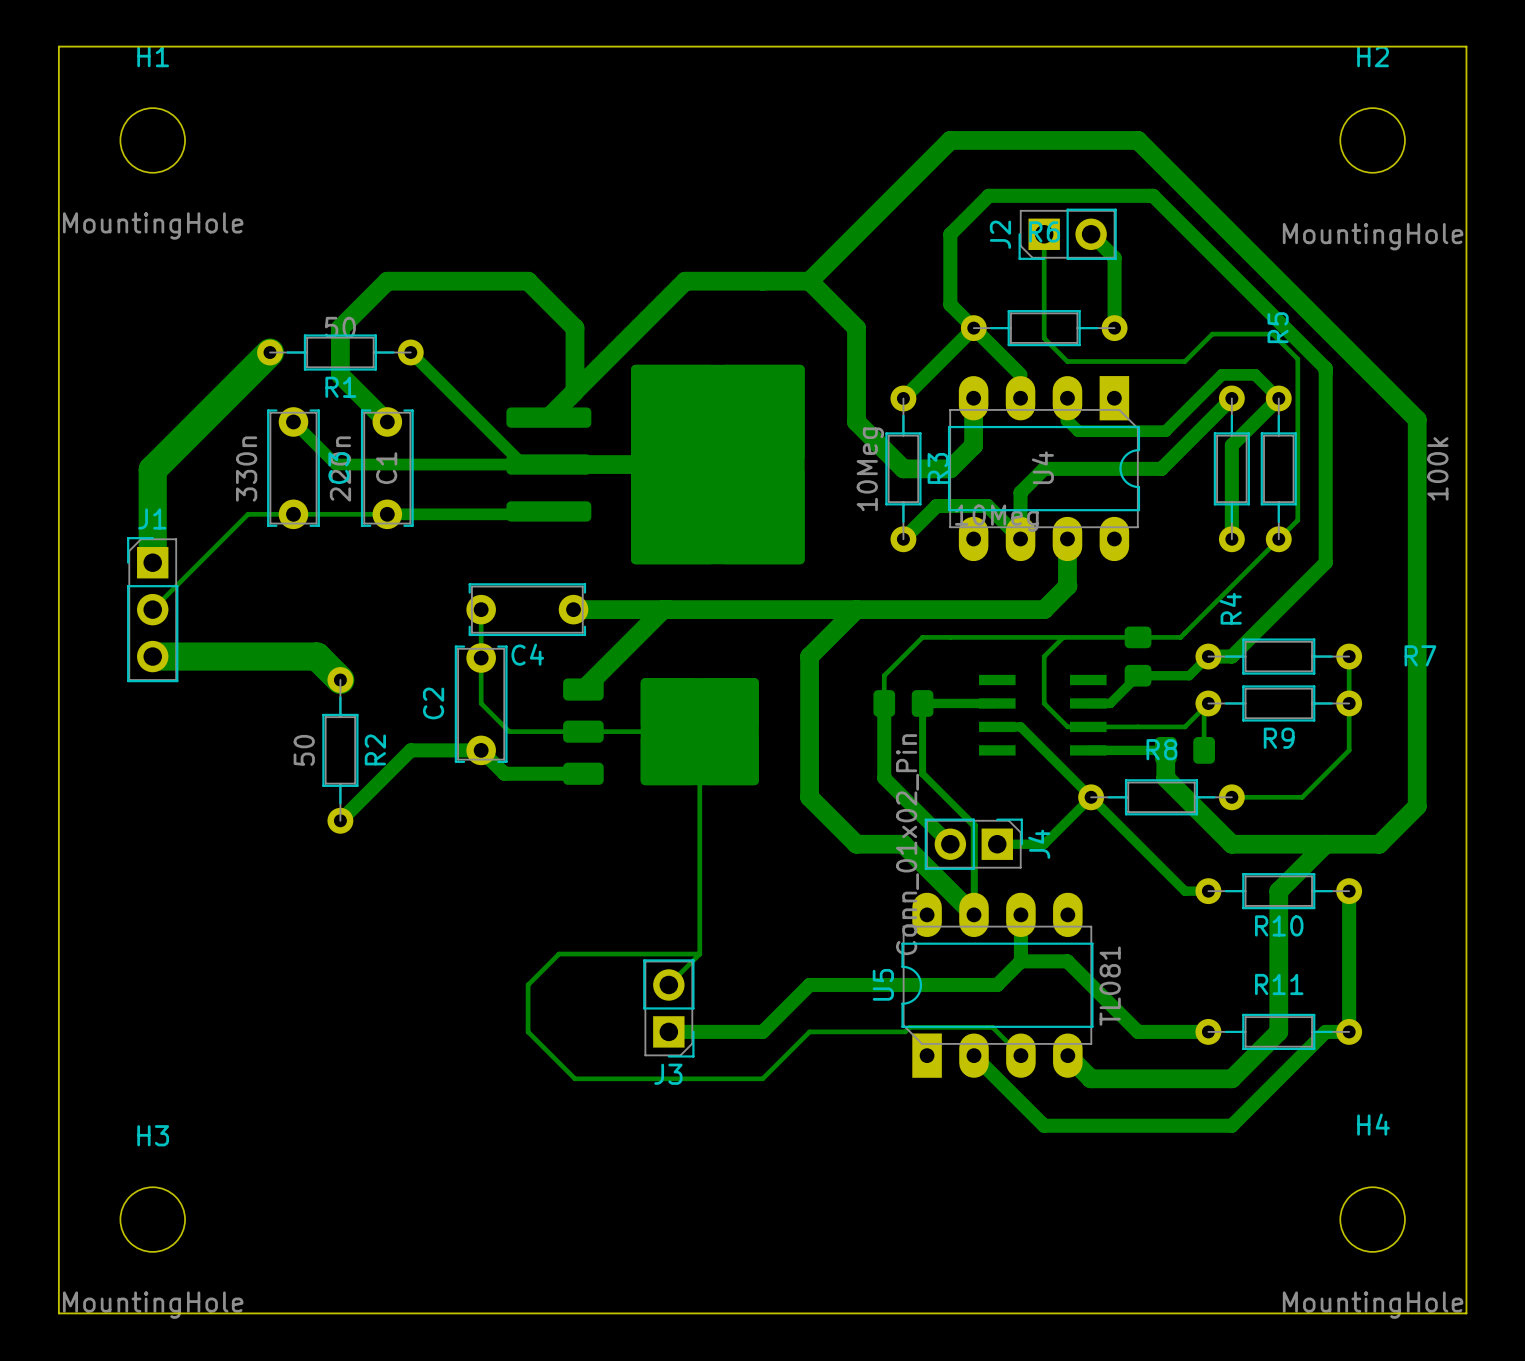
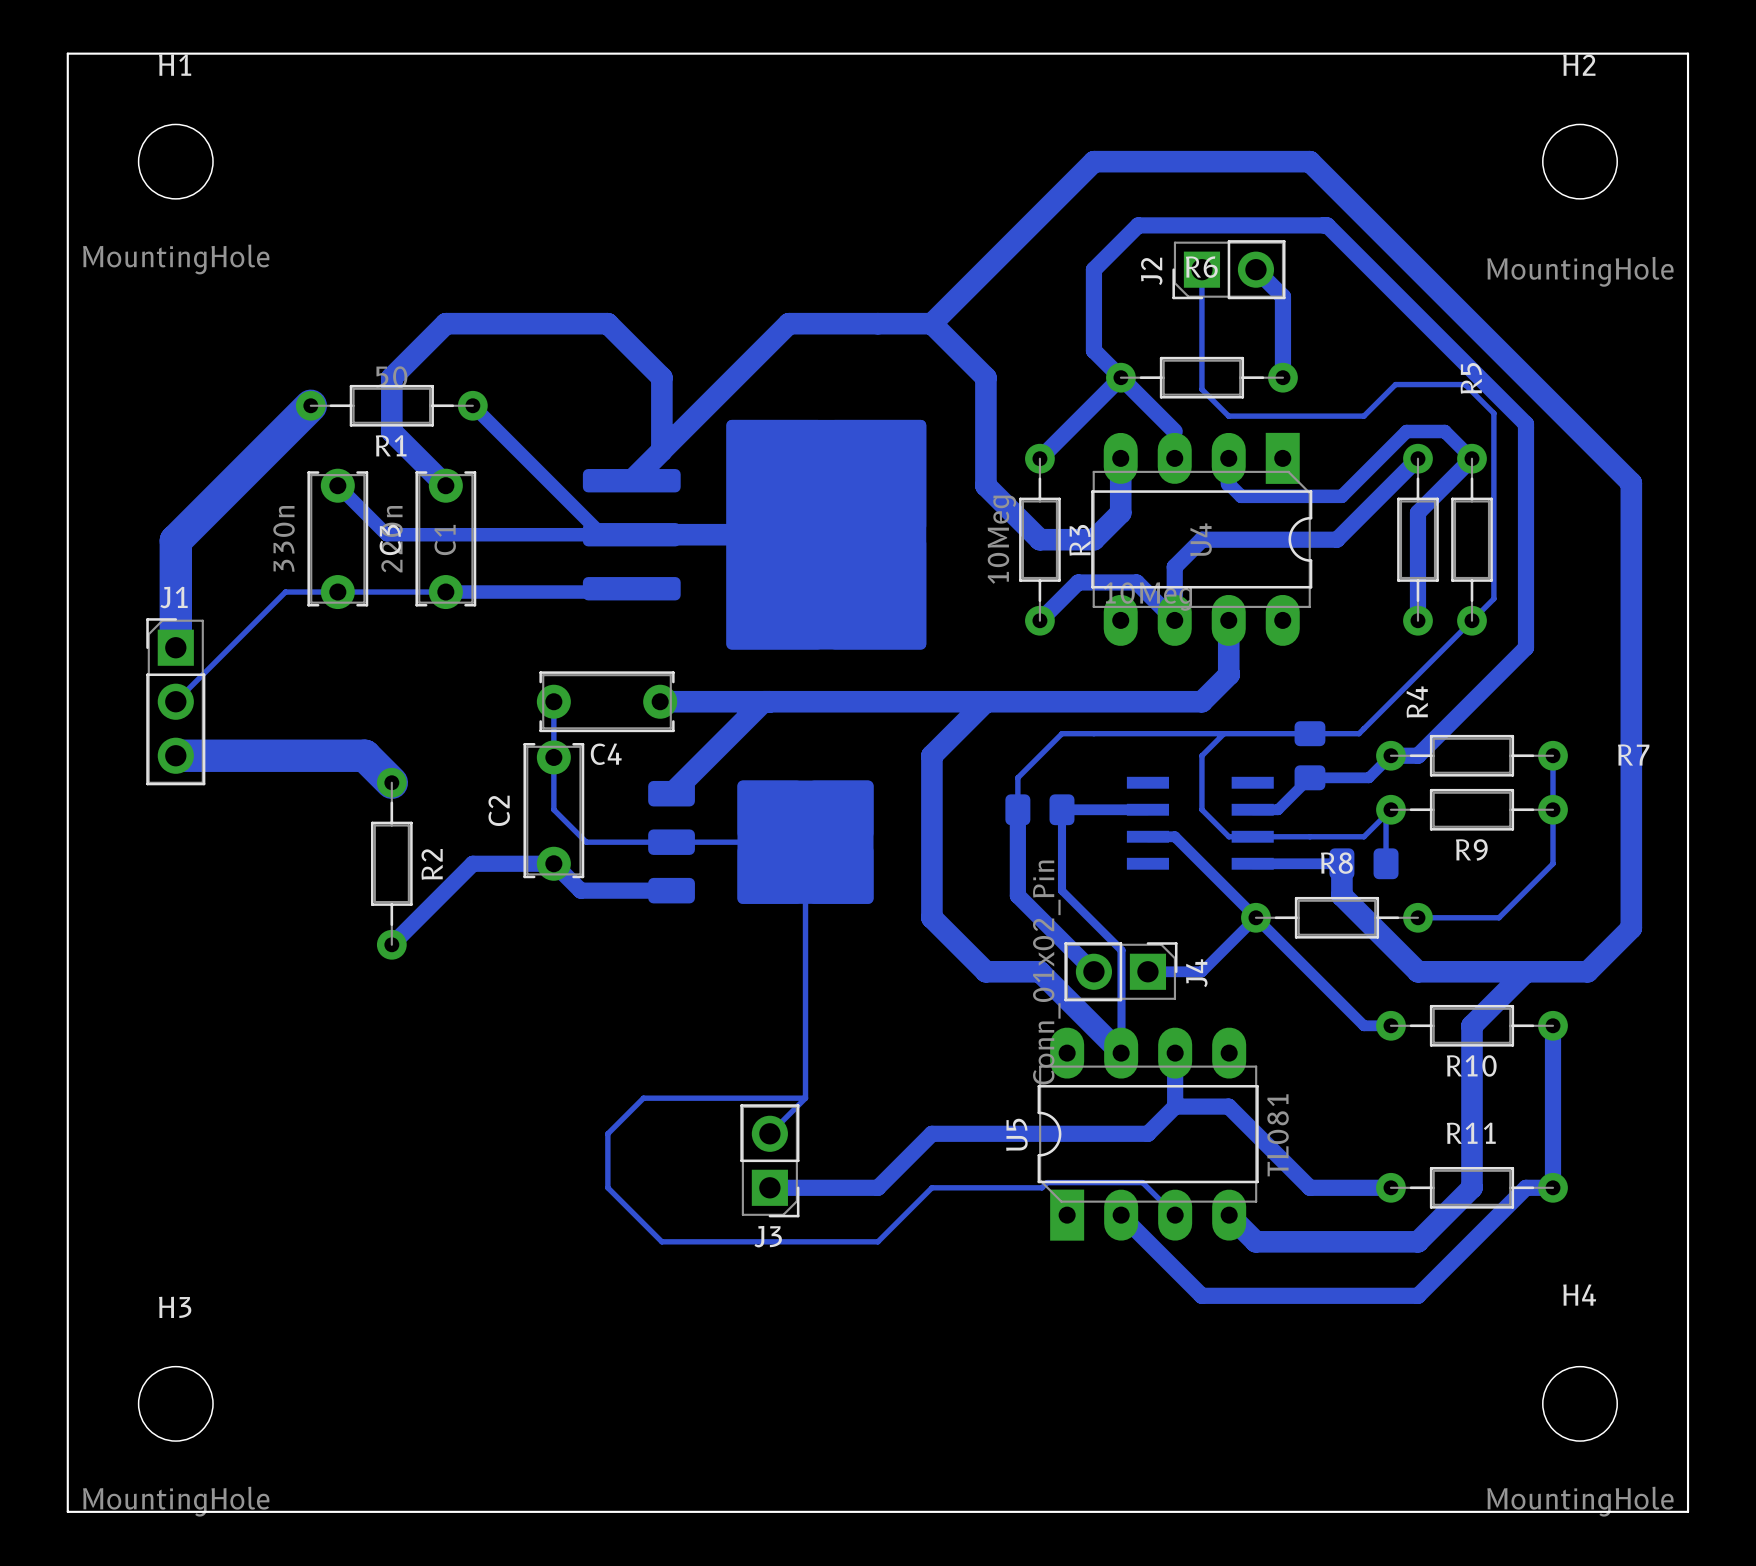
R5 value: 100k (1437, 468) -> none
R2 value: 50 (304, 750) -> none

